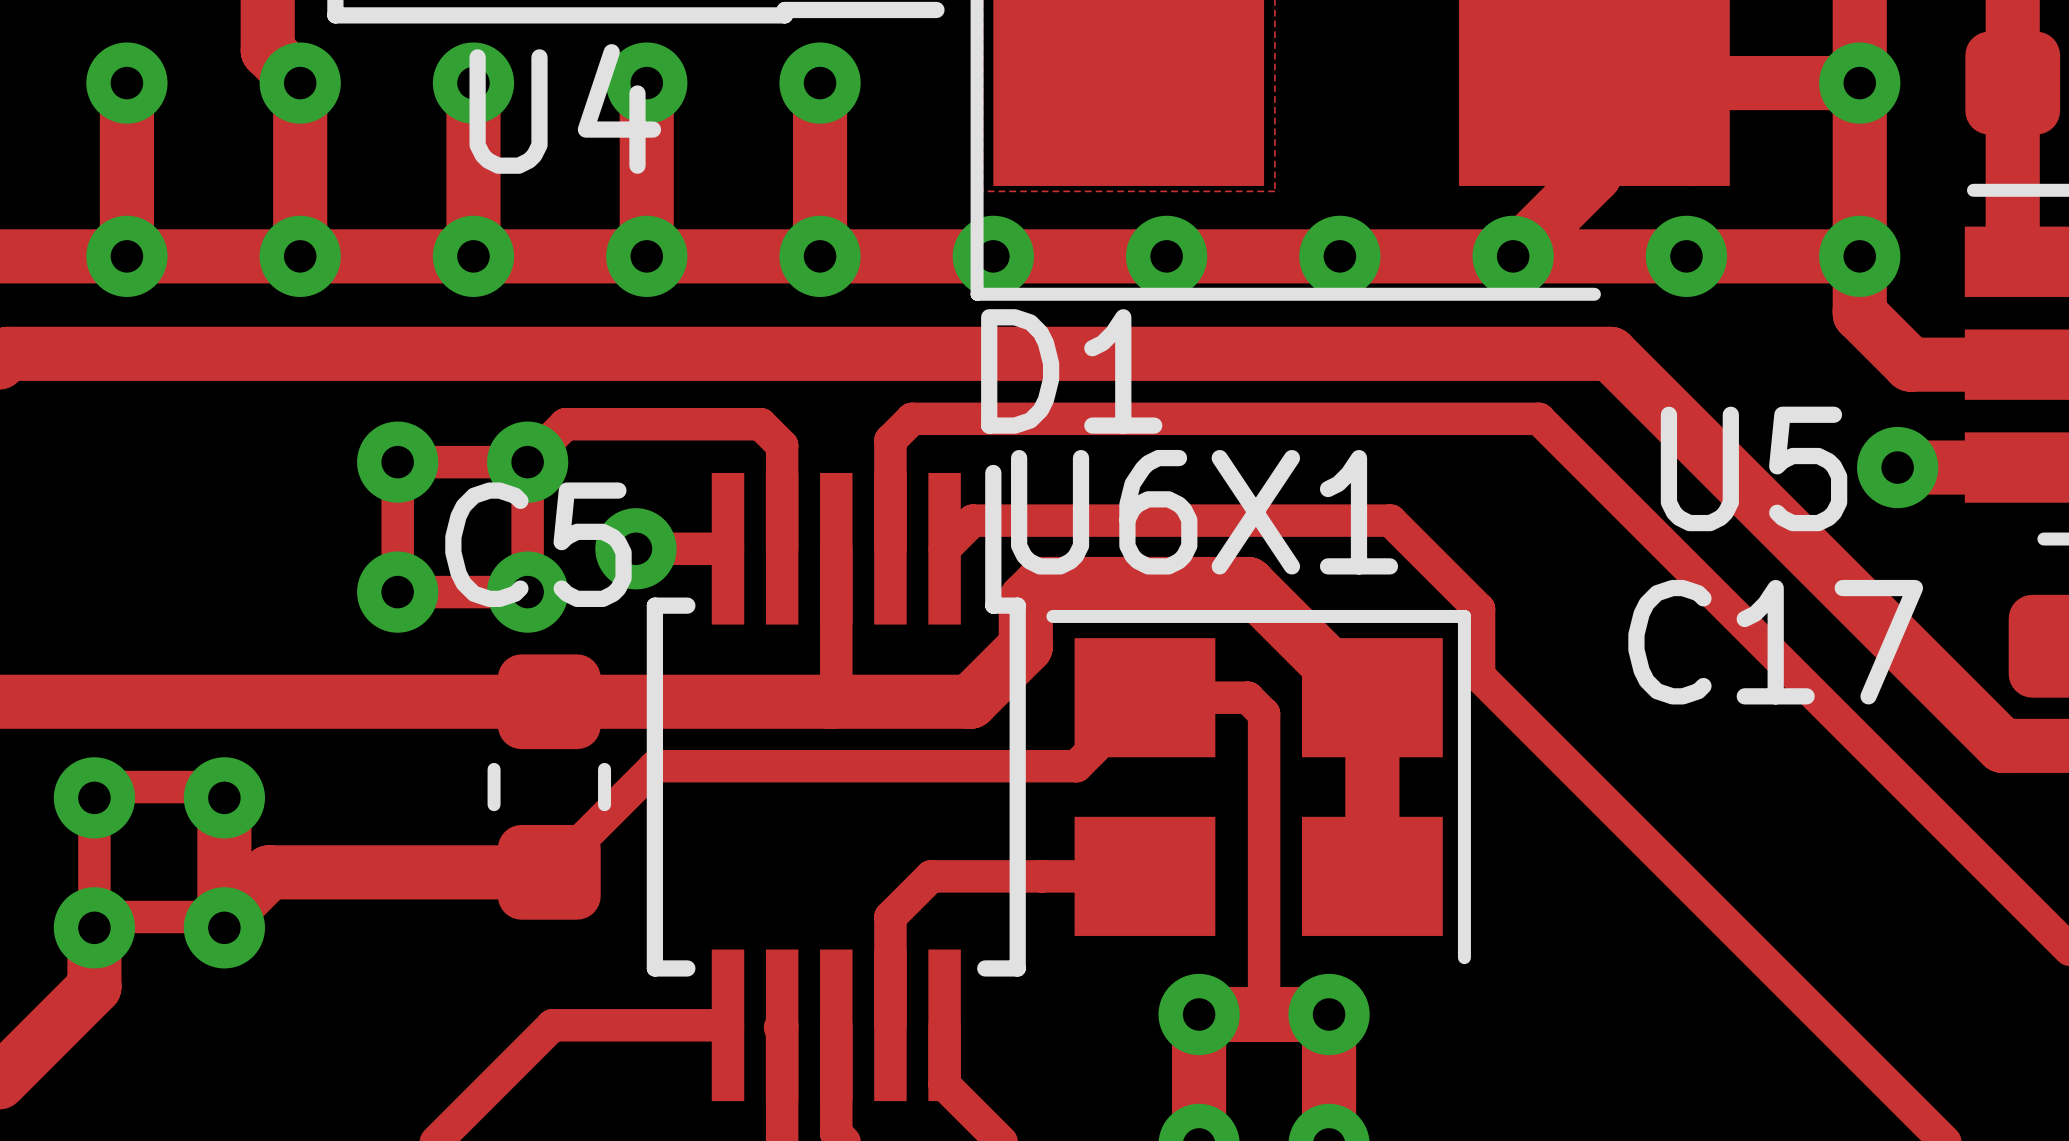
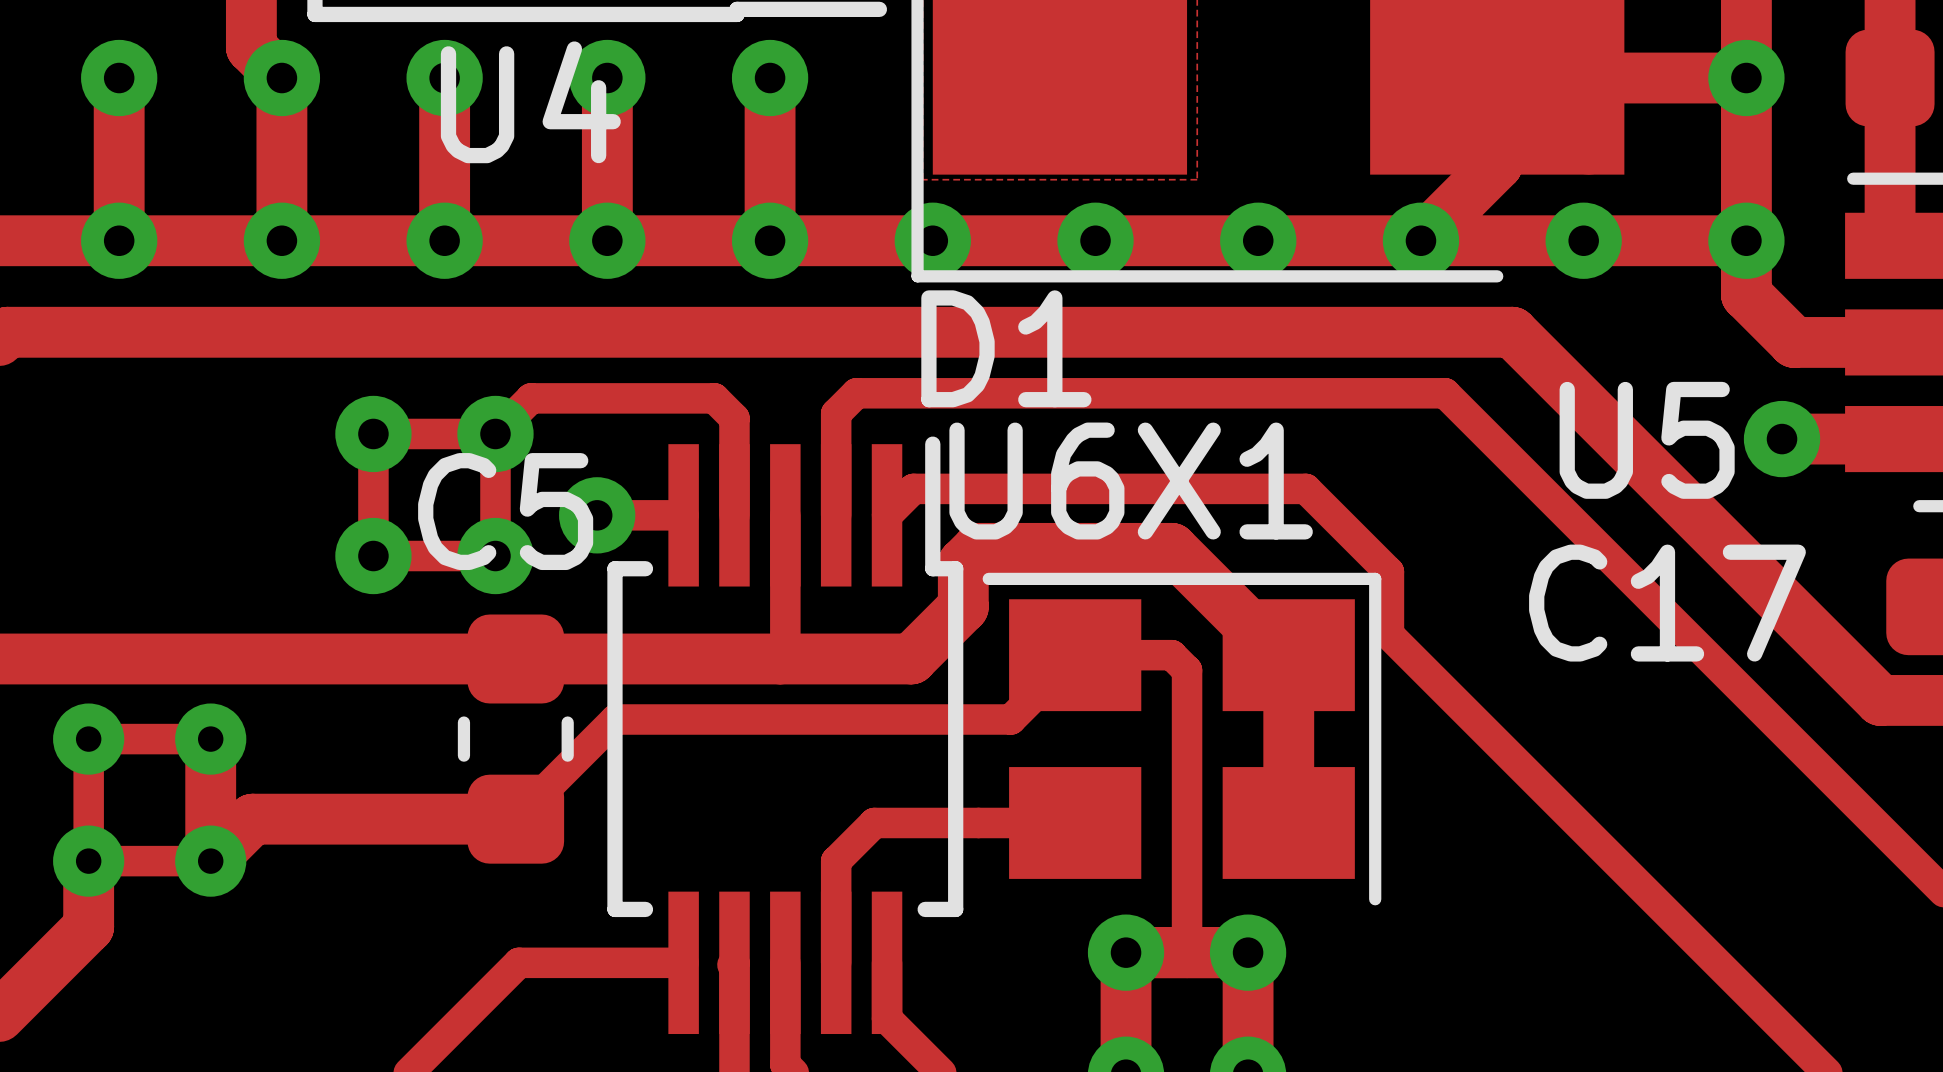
via size: [53, 757, 136, 839] -> [53, 703, 125, 775]
via size: [183, 757, 266, 839] -> [175, 703, 247, 775]
via size: [53, 887, 136, 969] -> [53, 825, 125, 897]
via size: [183, 887, 266, 969] -> [175, 825, 247, 897]

